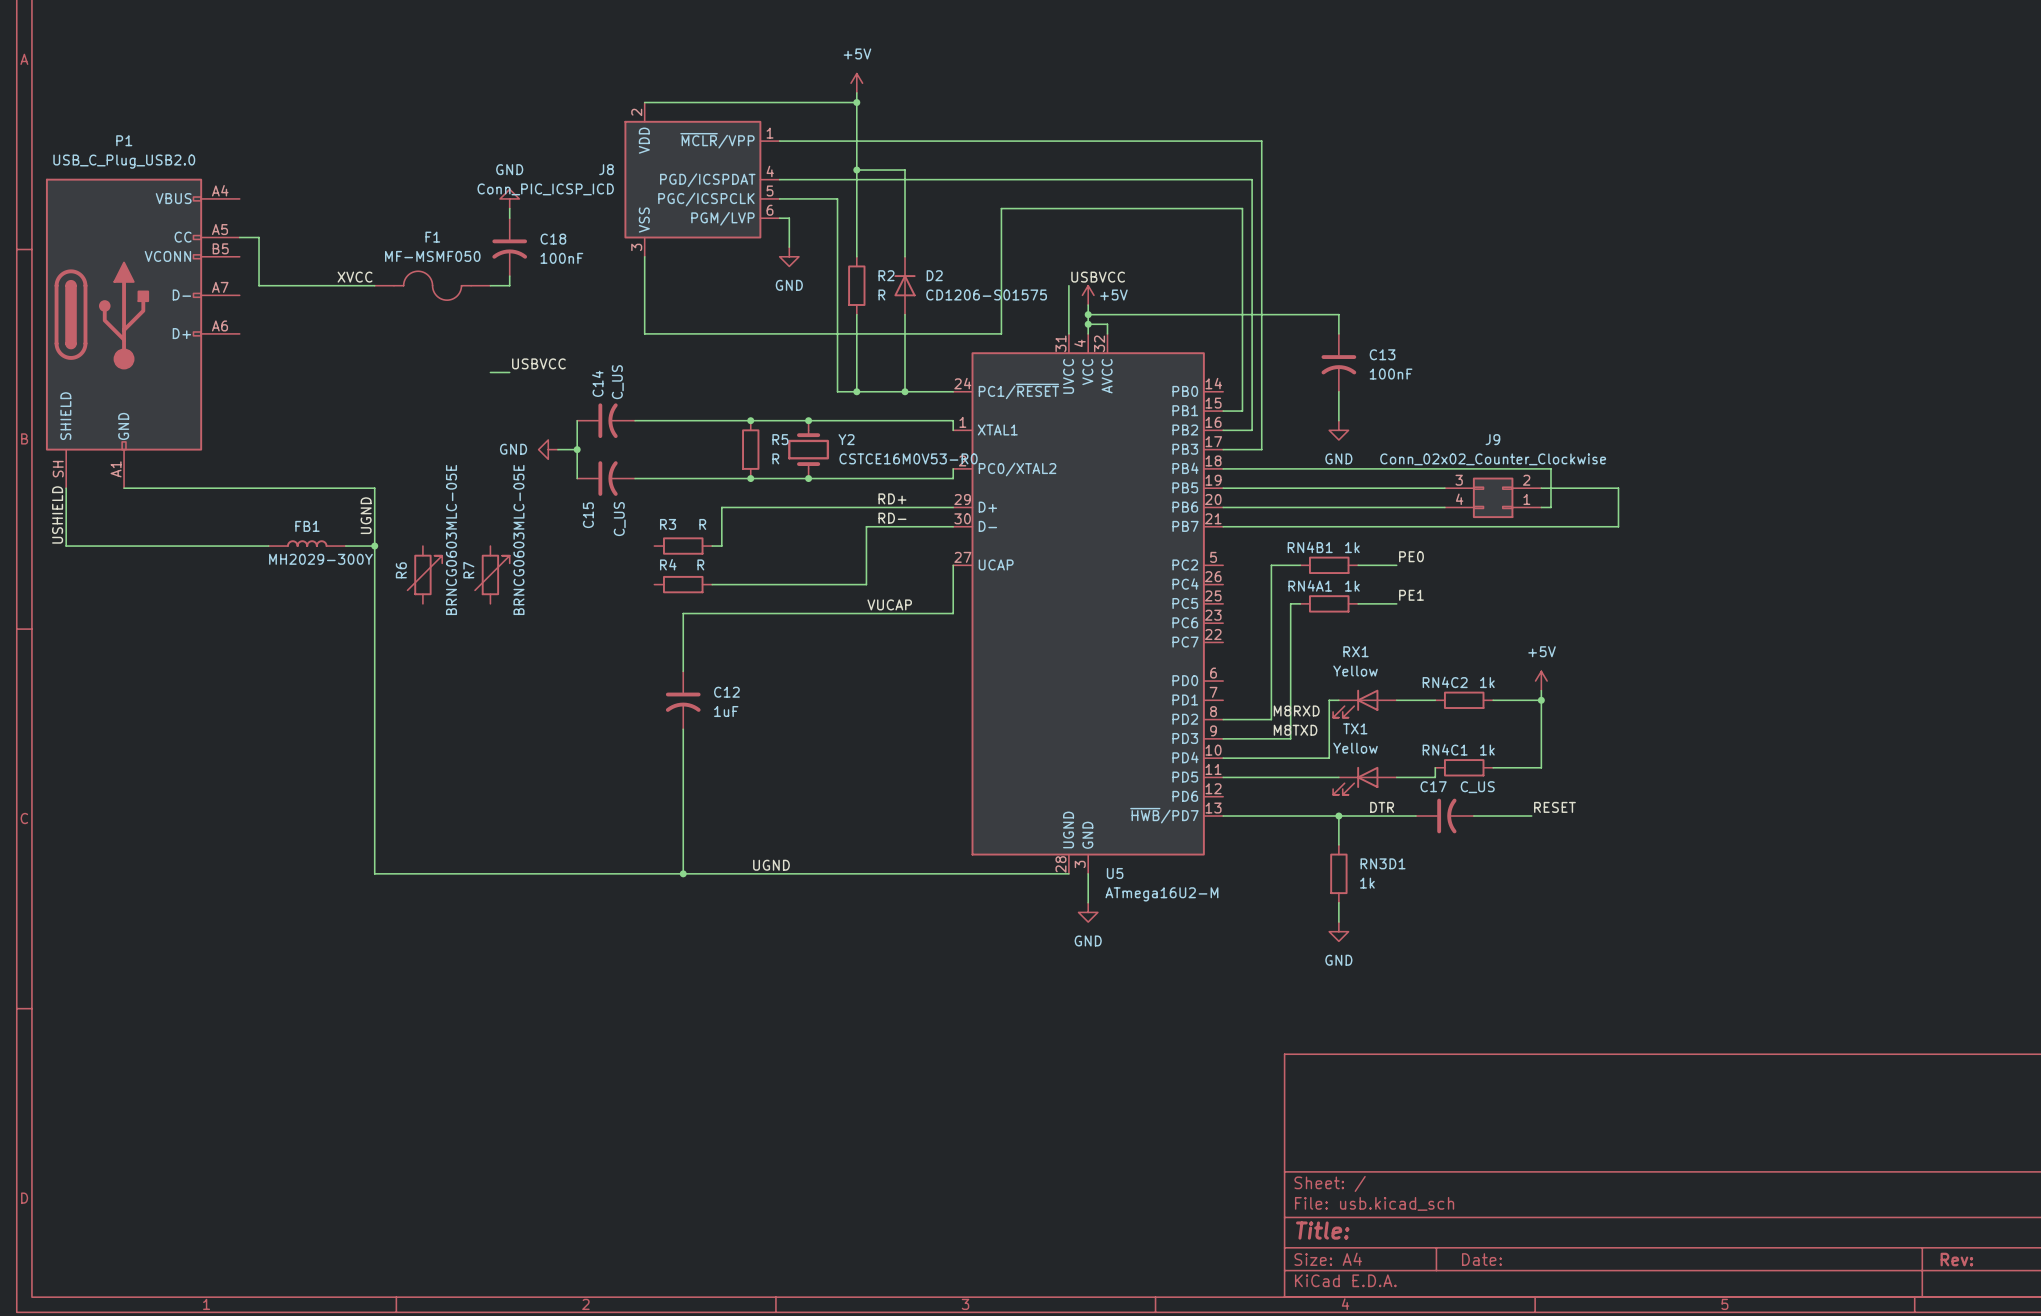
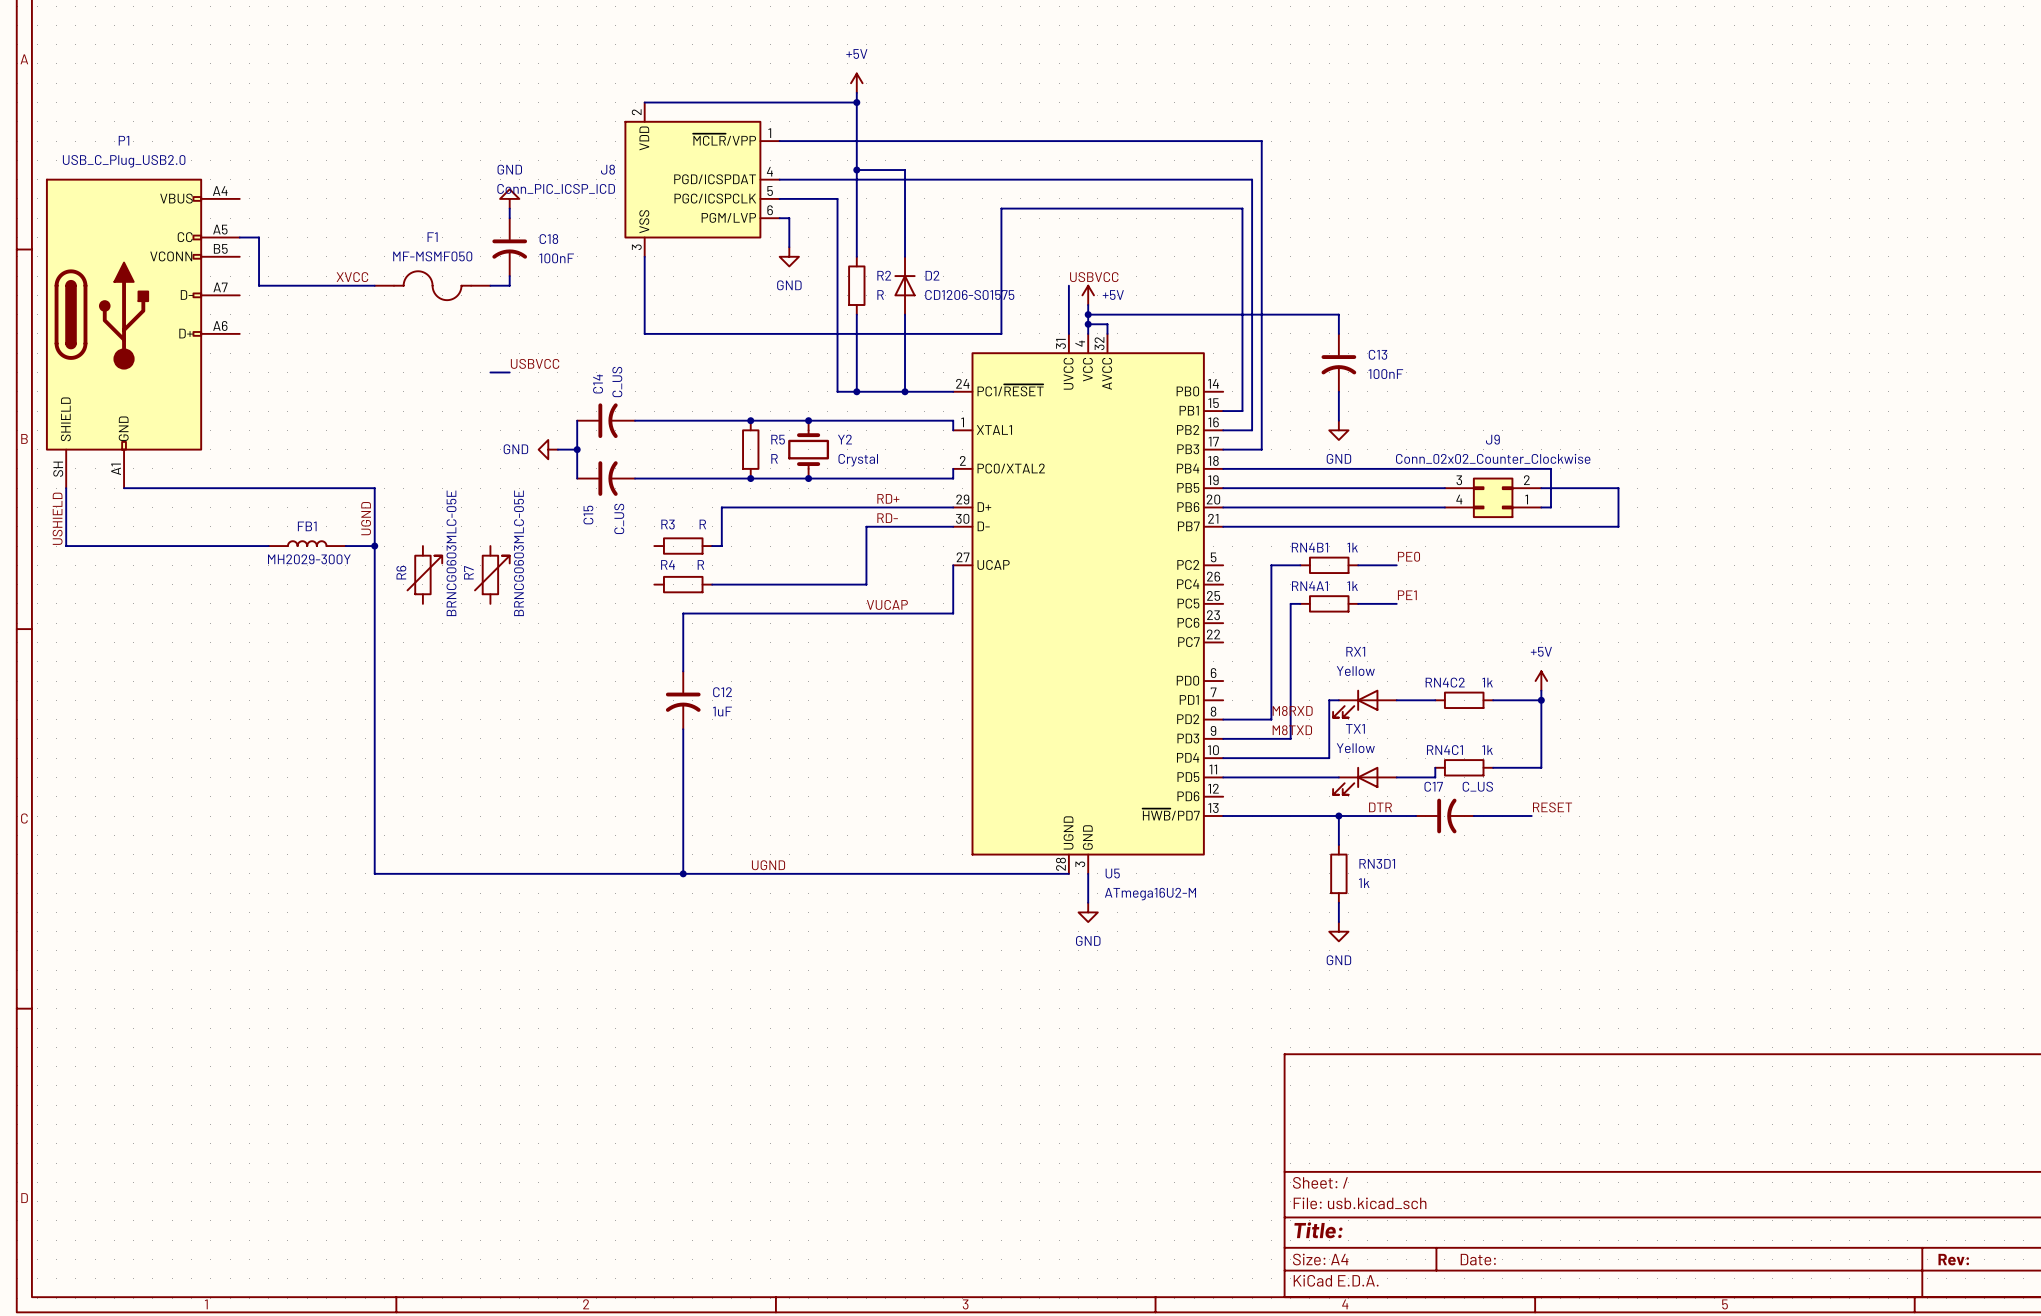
Y2 value: CSTCE16M0V53-R0 (908, 458) -> Crystal (858, 460)

